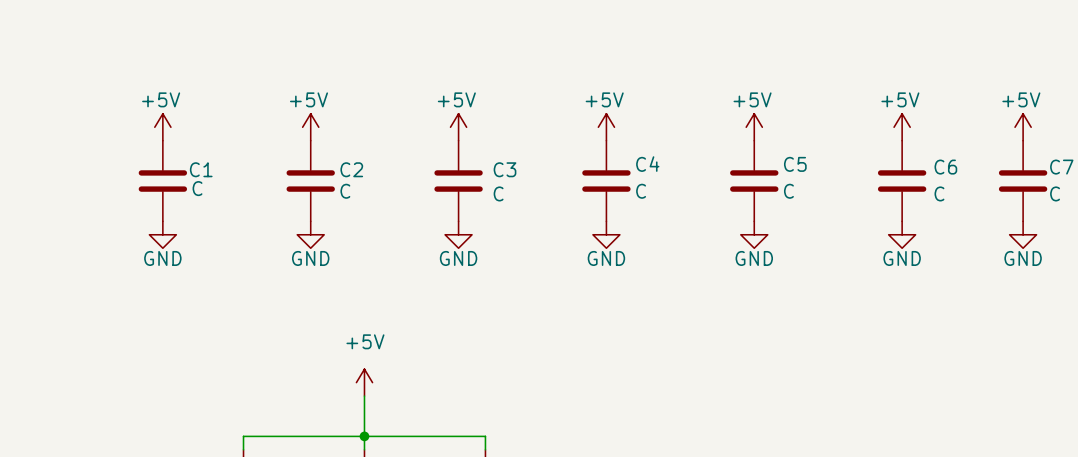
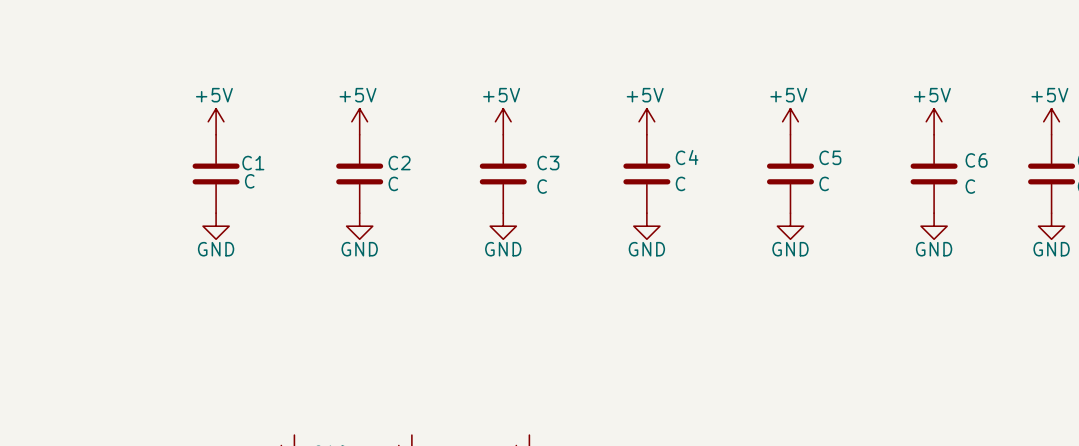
power symbol: +5V (364, 382) -> none
wire: (364, 396) (364, 449) -> none
junction: (364, 436) -> none
wire: (243, 449) (243, 436) (485, 436) (485, 449) -> none

